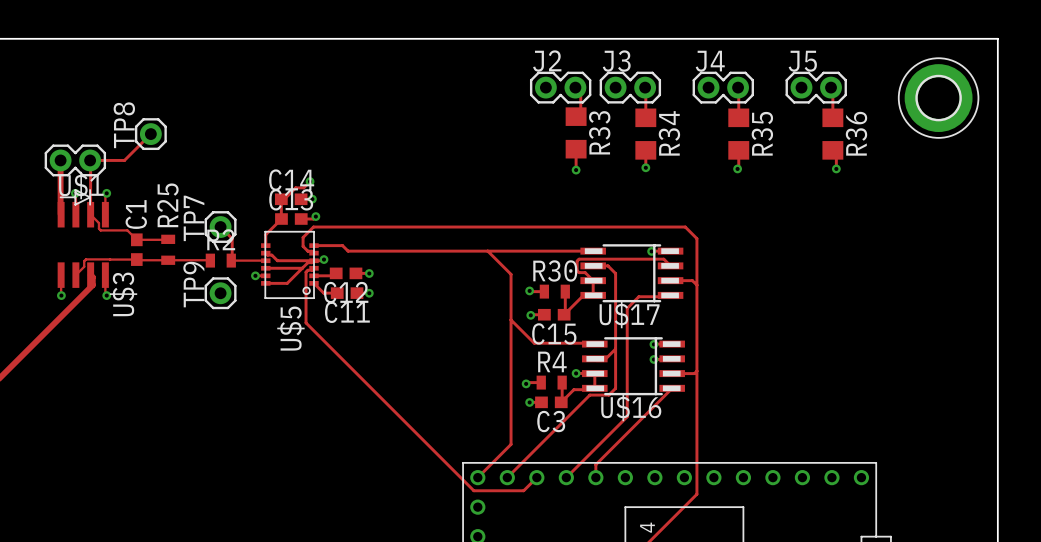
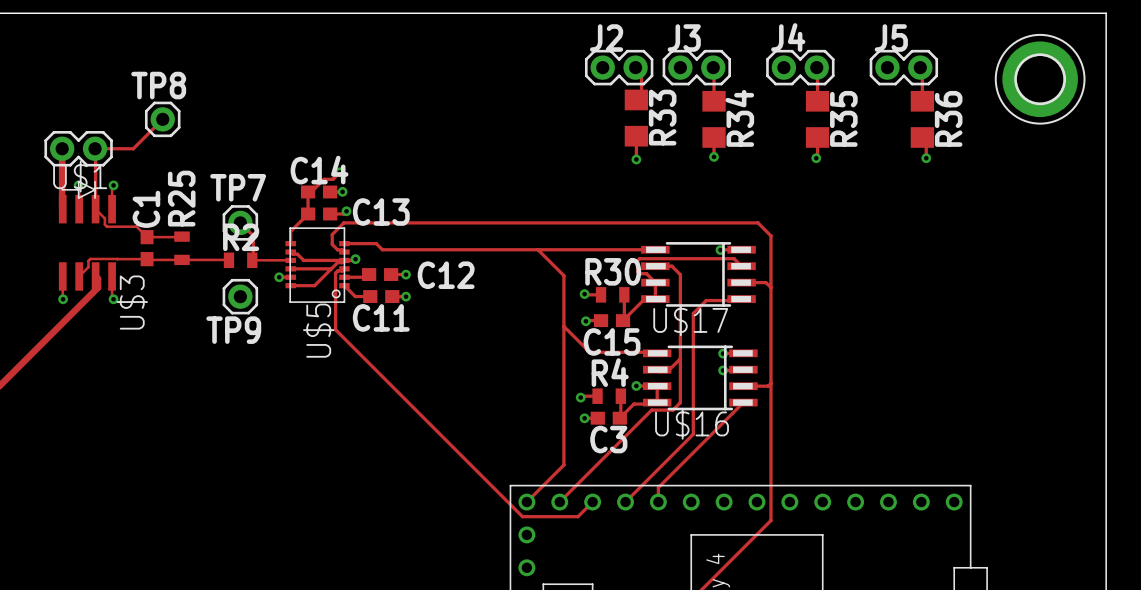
TP8 name rotation: 0° (124, 125) -> 90° clockwise (158, 85)
C13 name position: C13 (291, 199) -> C13 (381, 212)
TP7 name rotation: 0° (194, 218) -> 90° clockwise (238, 187)
TP9 name rotation: 0° (193, 284) -> 90° clockwise (233, 330)
C12 name position: C12 (346, 292) -> C12 (446, 275)

